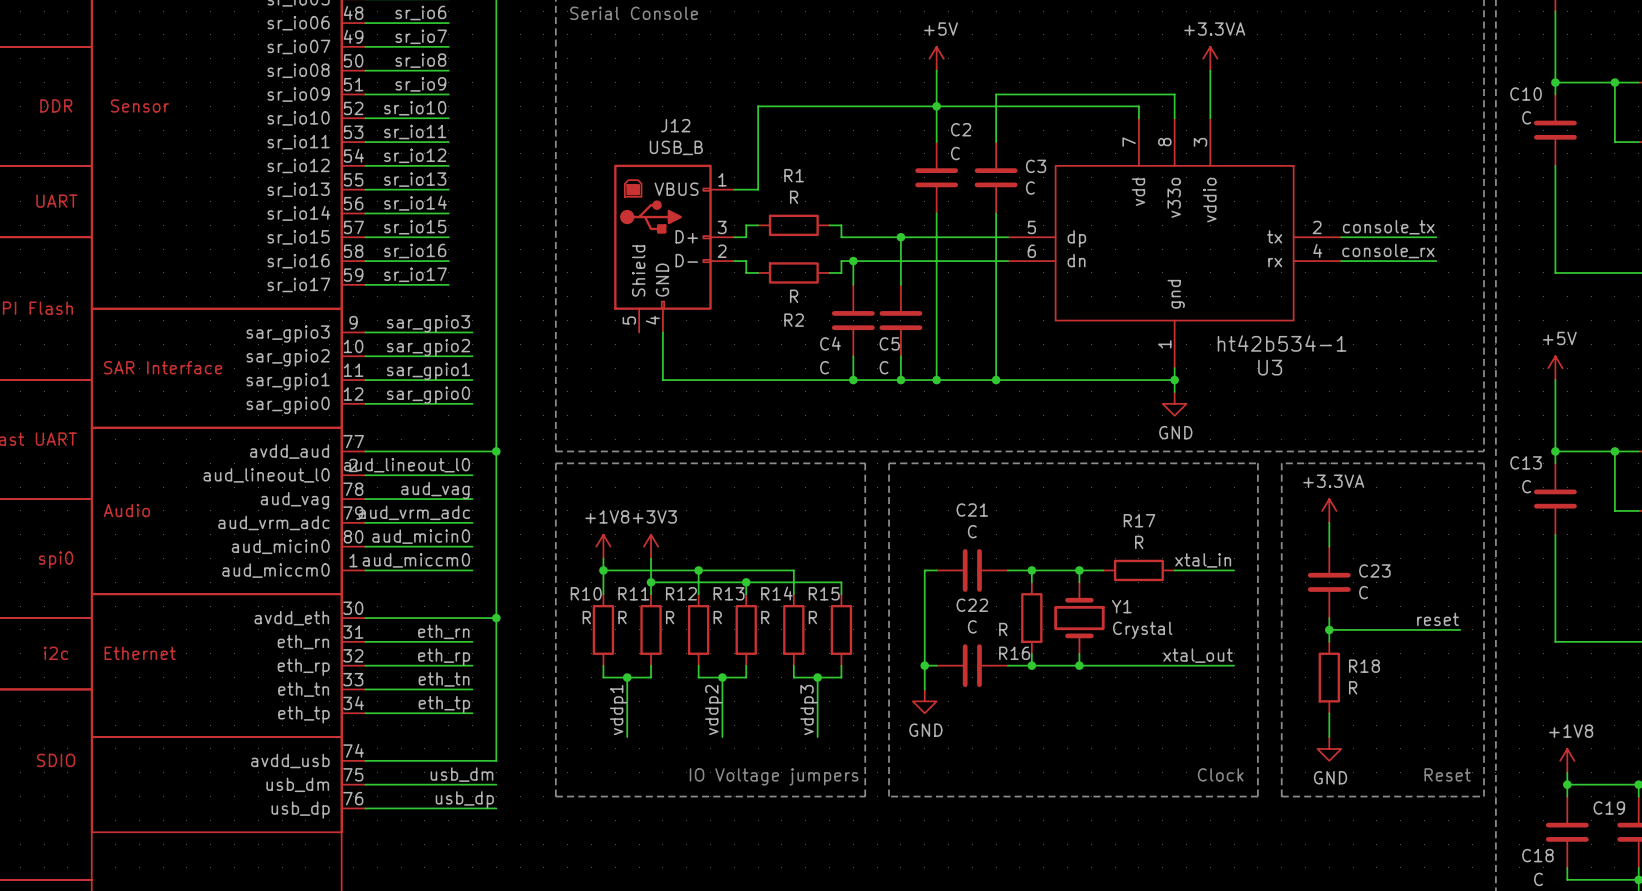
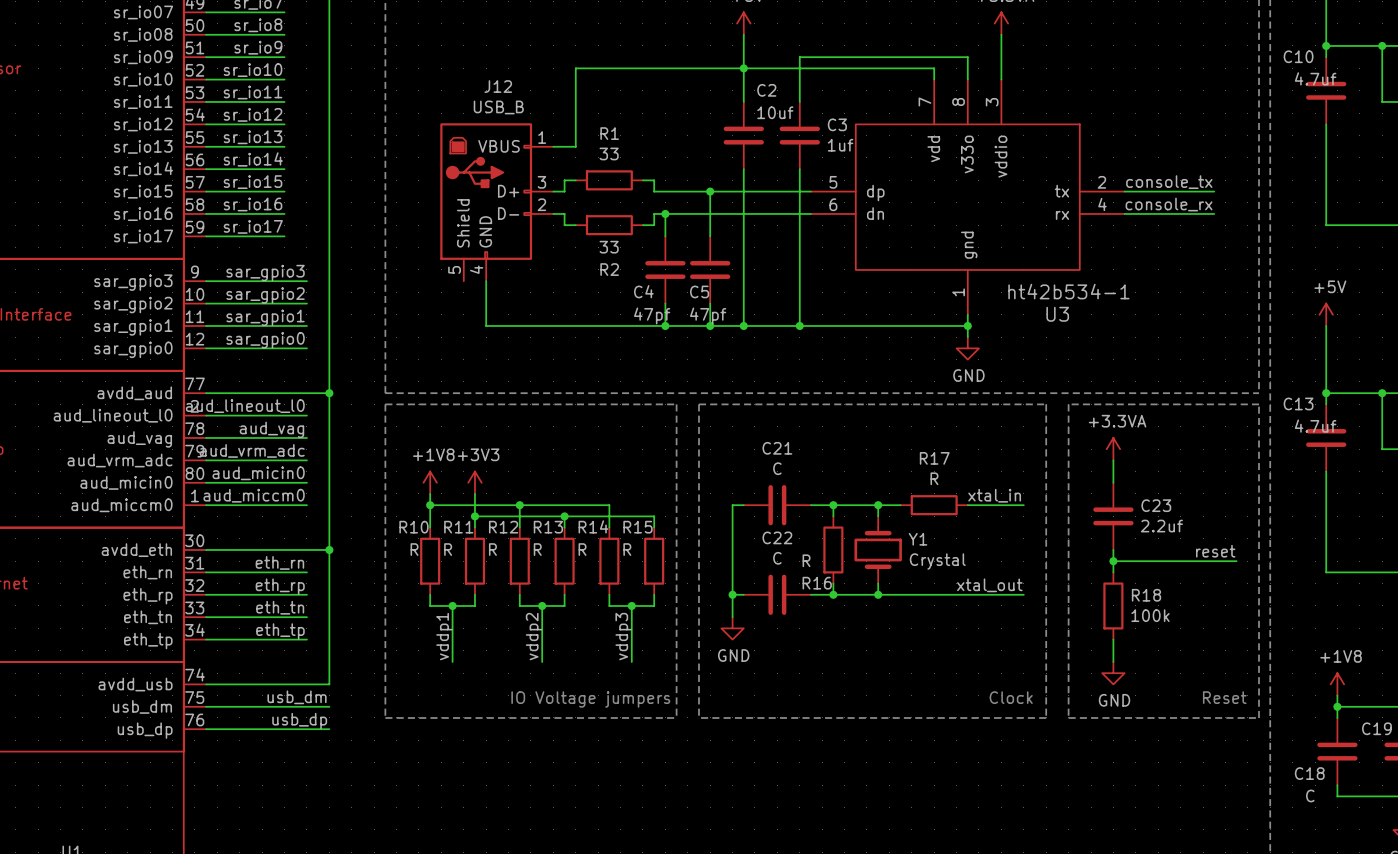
C10 value: C (1526, 117) -> 4.7uf (1315, 78)
C2 value: C (955, 153) -> 10uf (775, 112)
C3 value: C (1030, 188) -> 1uf (840, 145)
R1 value: R (794, 197) -> 33 (609, 153)
R2 value: R (794, 296) -> 33 (609, 247)
C4 value: C (824, 367) -> 47pf (652, 315)
C5 value: C (884, 367) -> 47pf (708, 315)
C13 value: C (1526, 486) -> 4.7uf (1315, 426)
C23 value: C (1363, 592) -> 2.2uf (1161, 526)
R18 value: R (1353, 687) -> 100k (1150, 615)

